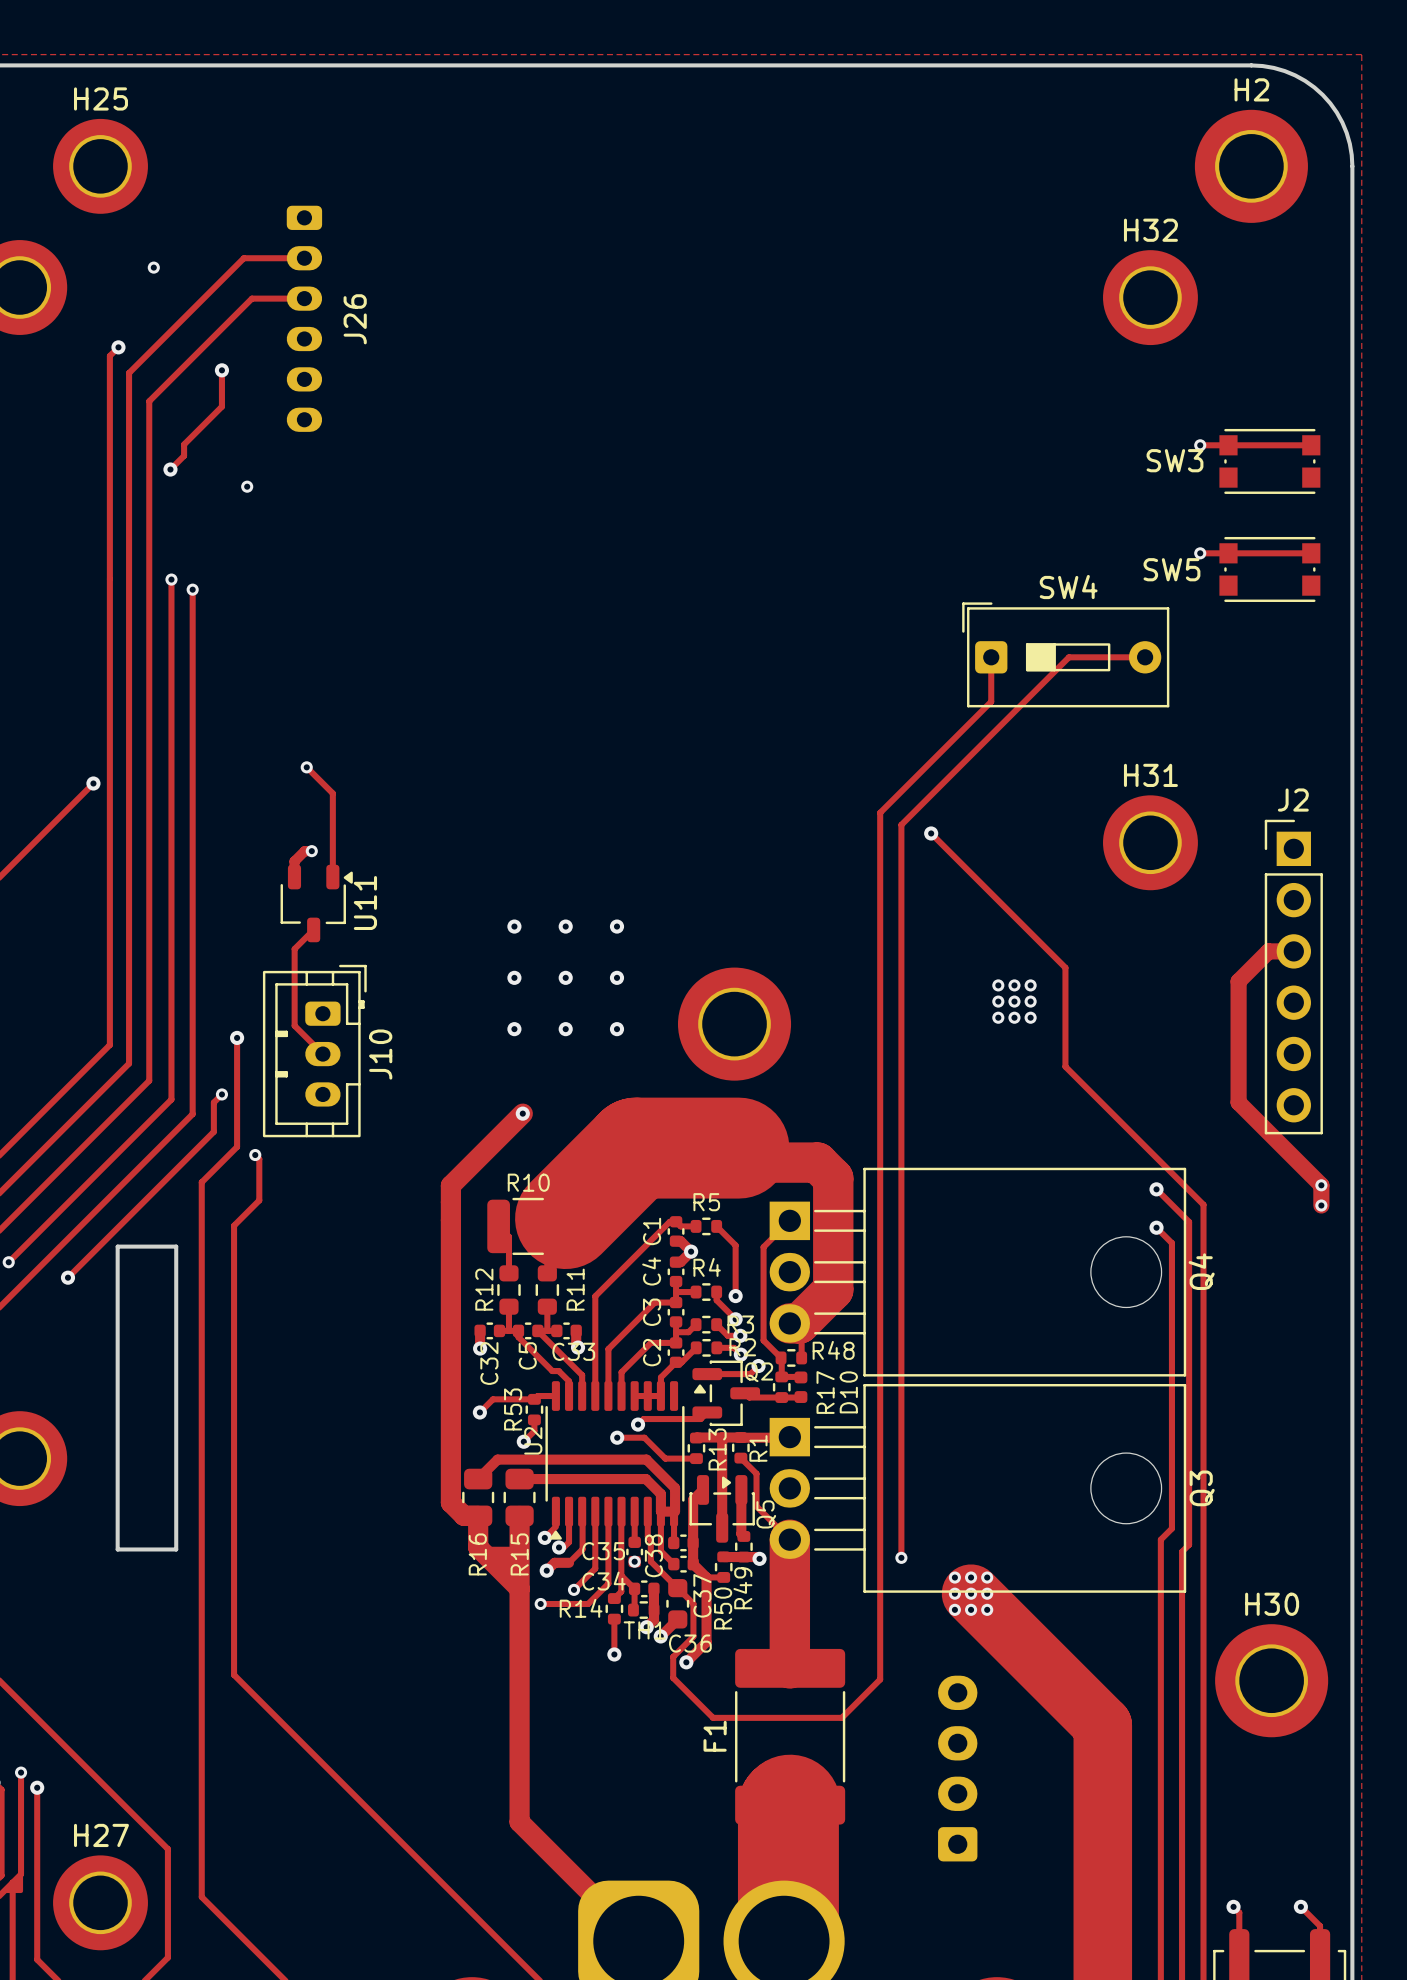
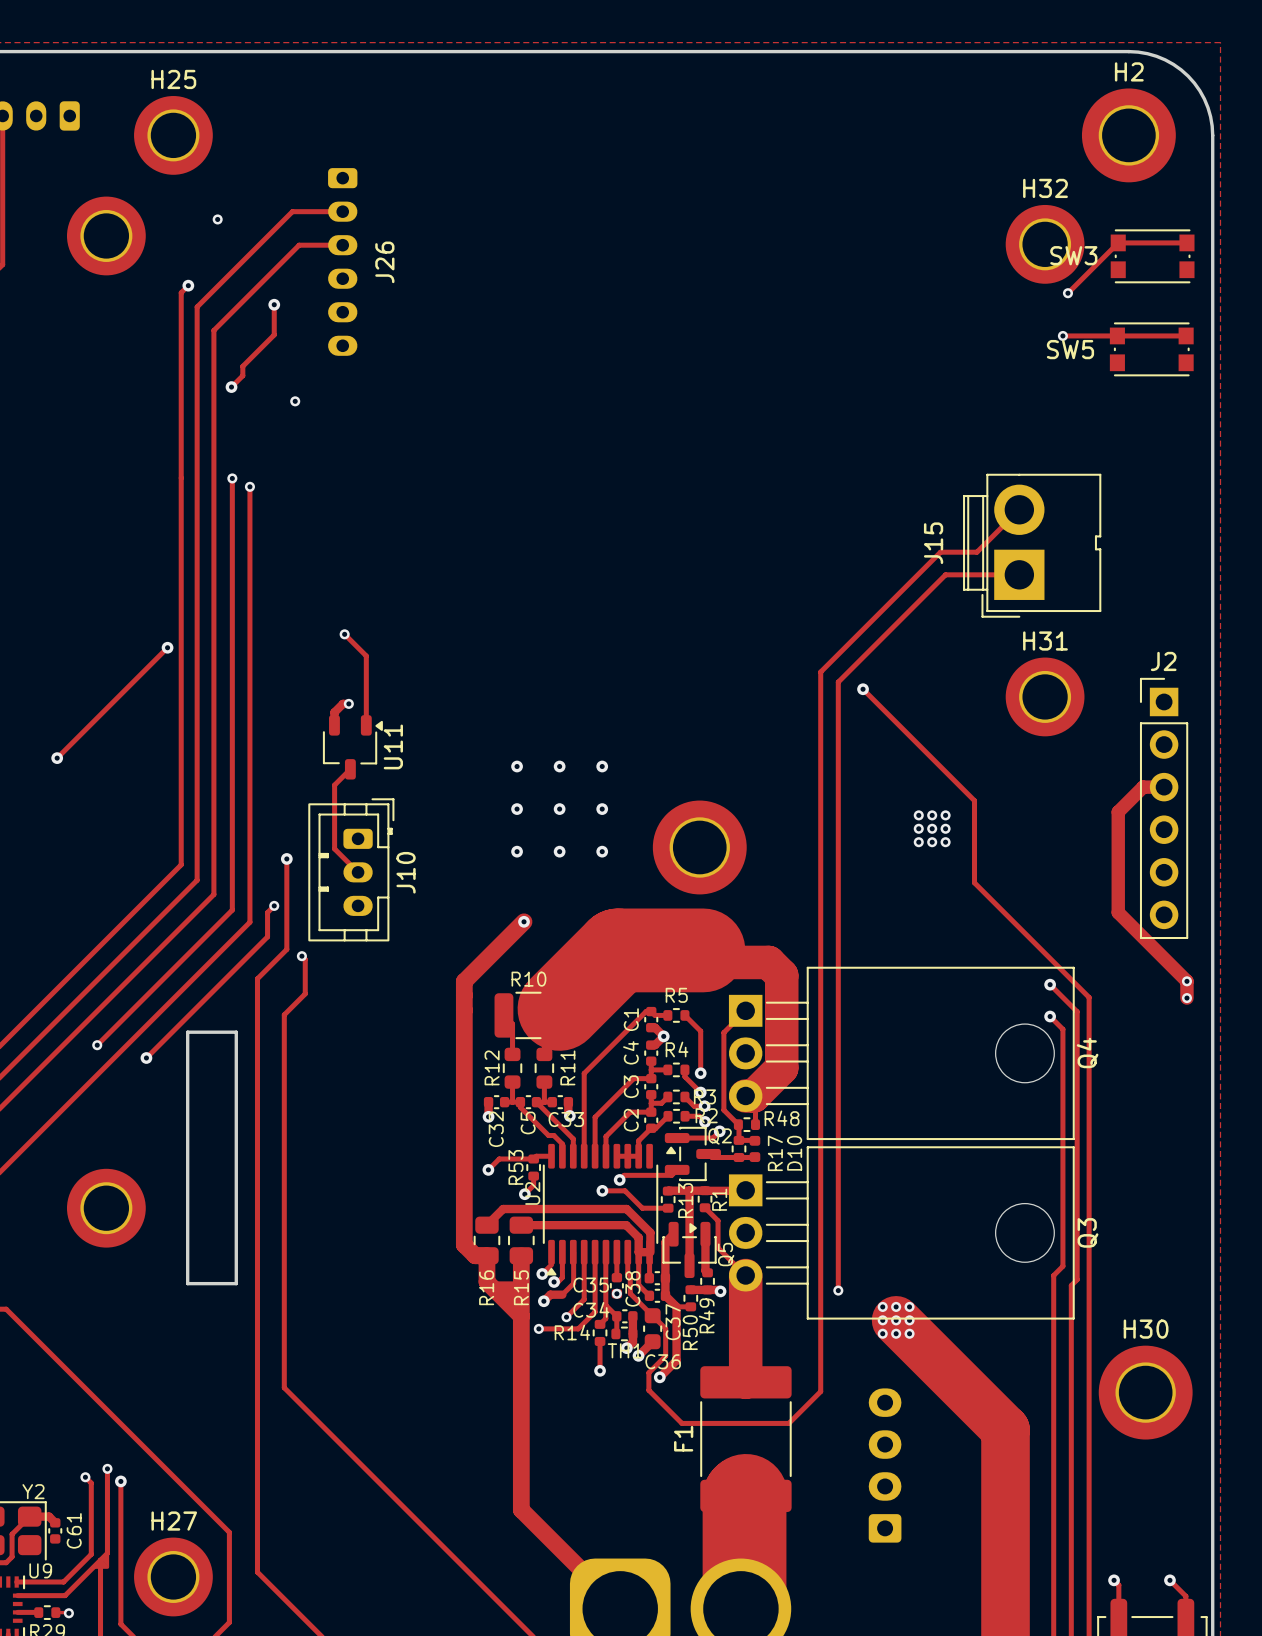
track: none -> (1186, 242) (1118, 242) (1067, 293)
via: none -> (1067, 293)
track: none -> (1062, 335) (1186, 335)
via: none -> (1062, 335)
track: (1200, 445) (1311, 445) -> none
via: (1200, 445) -> none
SW3 position: (1269, 461) -> (1152, 256)
track: (1200, 553) (1311, 553) -> none
via: (1200, 553) -> none
SW5 position: (1269, 569) -> (1151, 349)
SW4: (1065, 654) -> none
track: (991, 657) (991, 701) -> (1019, 509) (976, 552) (940, 552) (912, 579)
track: (1145, 657) (1068, 657) (1030, 695) -> (1019, 574) (945, 574)
J15: none -> (1032, 545)

